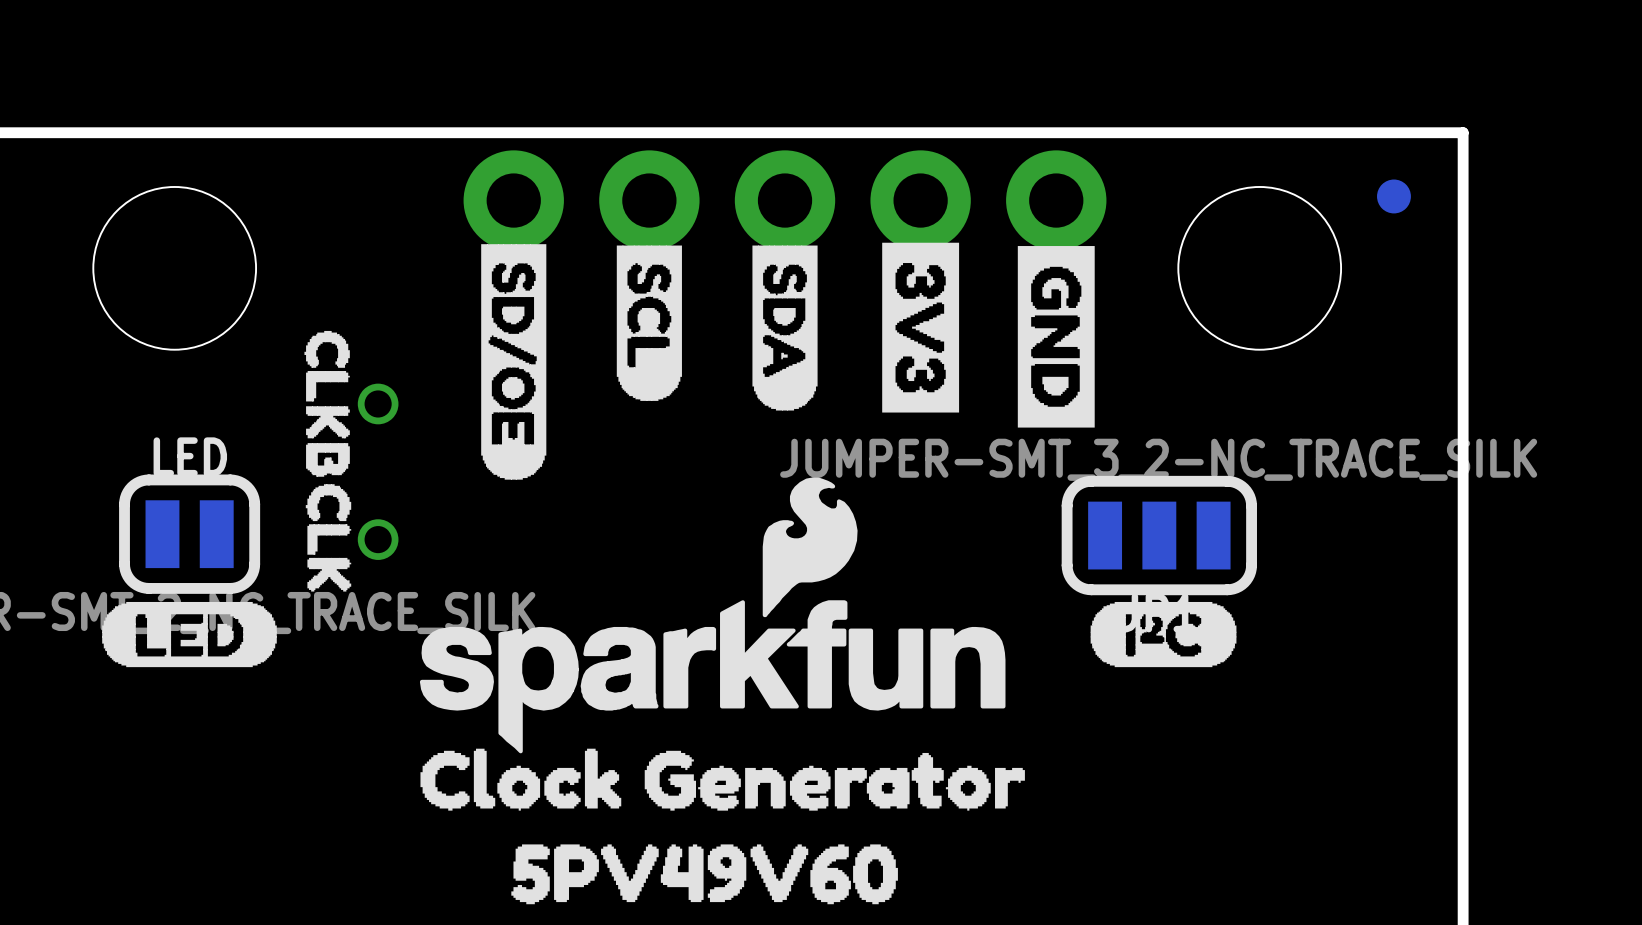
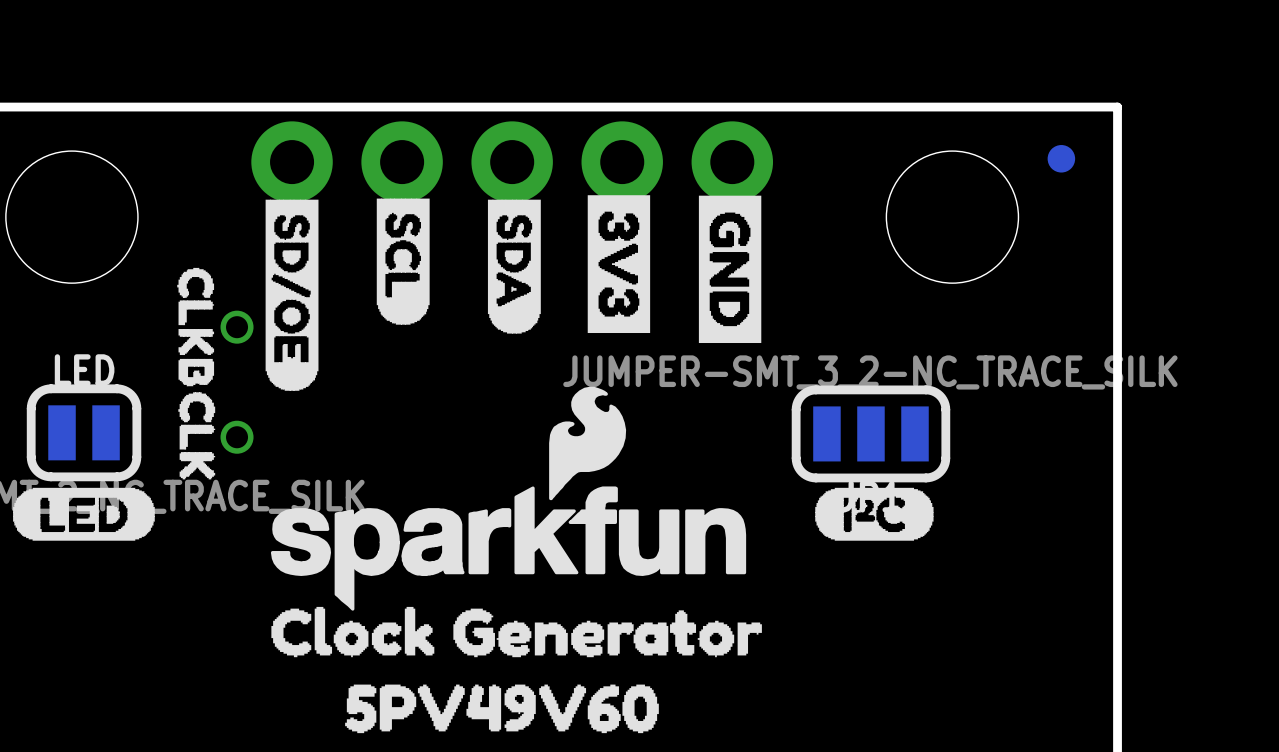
part position: (785, 200) -> (512, 162)
drawing position: (649, 323) -> (403, 261)
drawing position: (920, 327) -> (618, 264)
drawing position: (785, 328) -> (514, 266)
drawing position: (1056, 336) -> (730, 269)
drawing position: (513, 361) -> (292, 295)

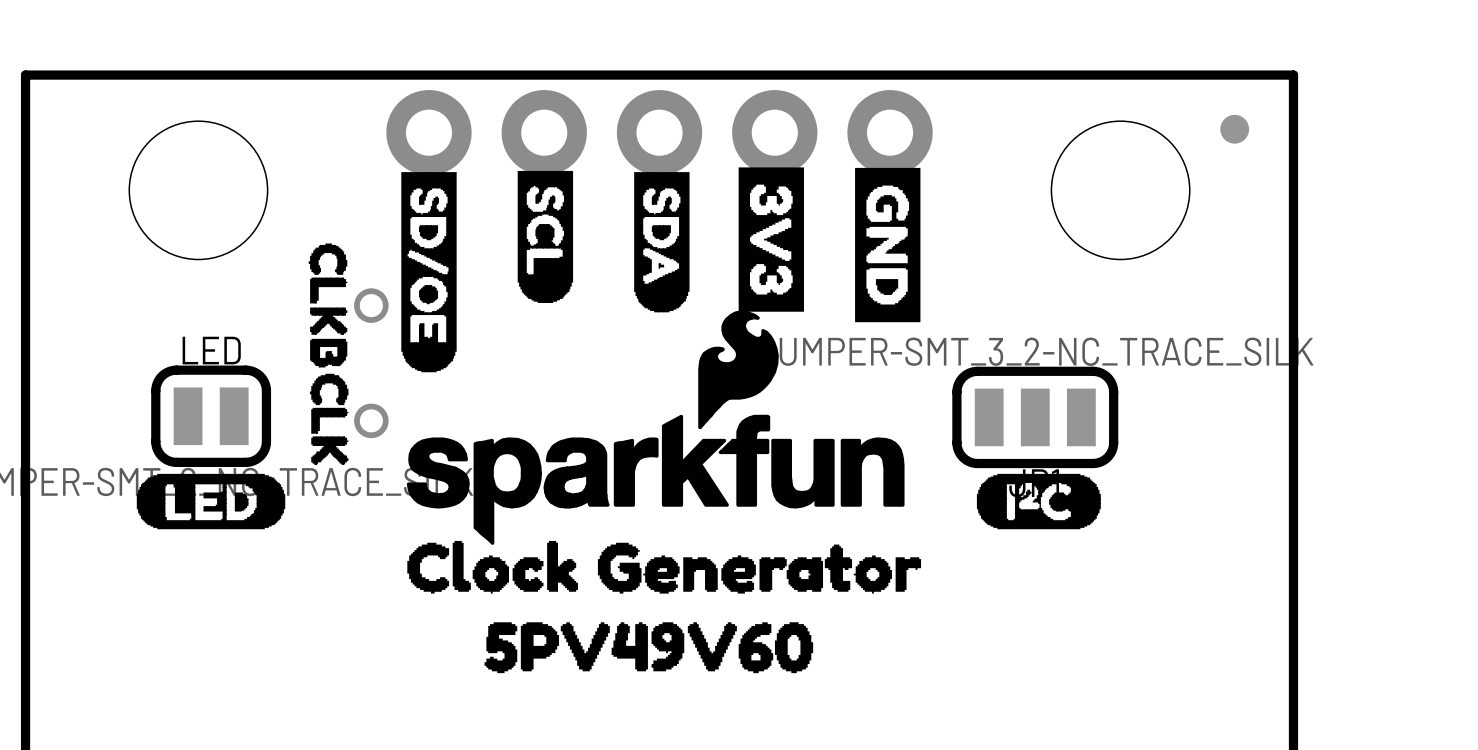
drawing position: (508, 498) -> (655, 427)
drawing position: (516, 632) -> (664, 567)
drawing position: (501, 708) -> (648, 647)

